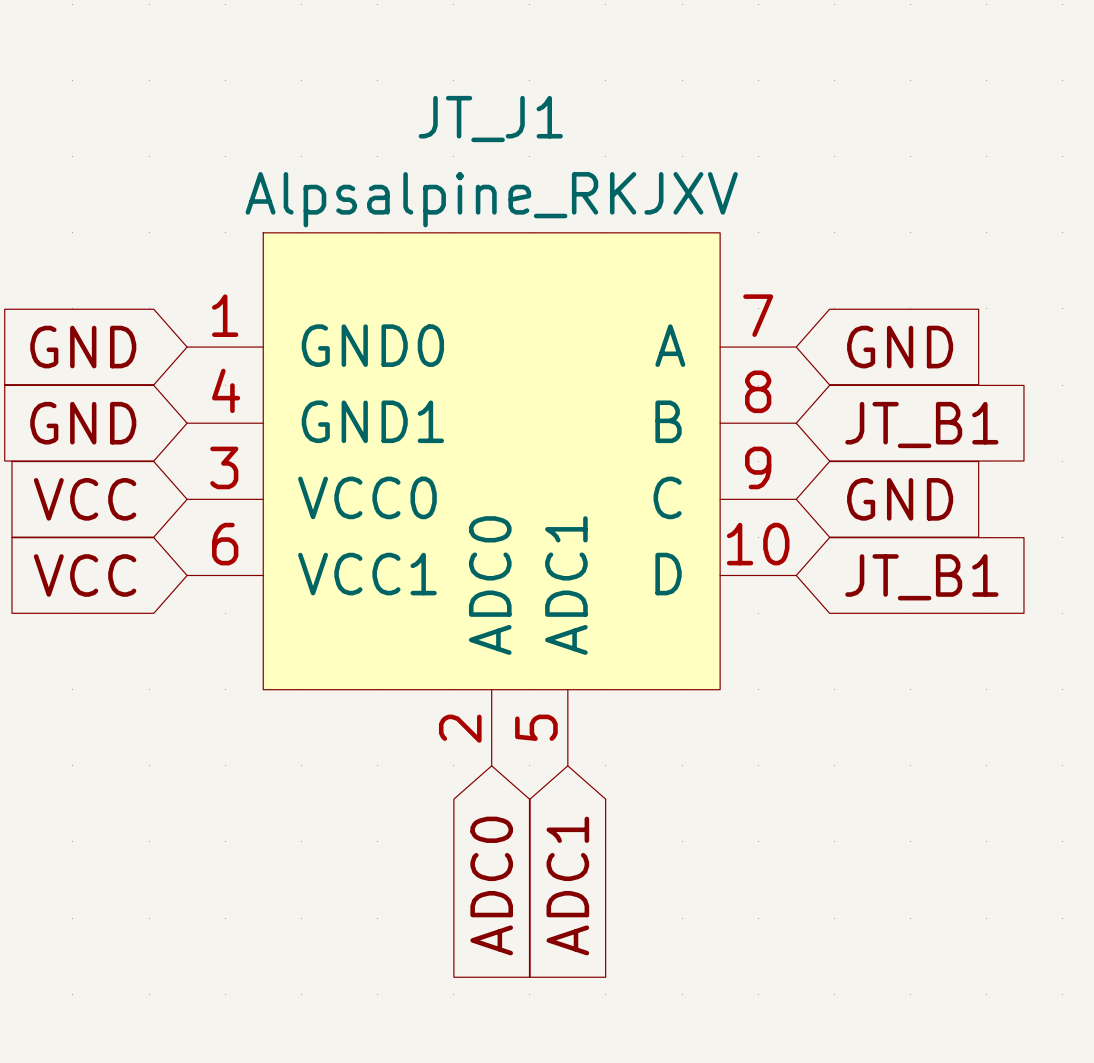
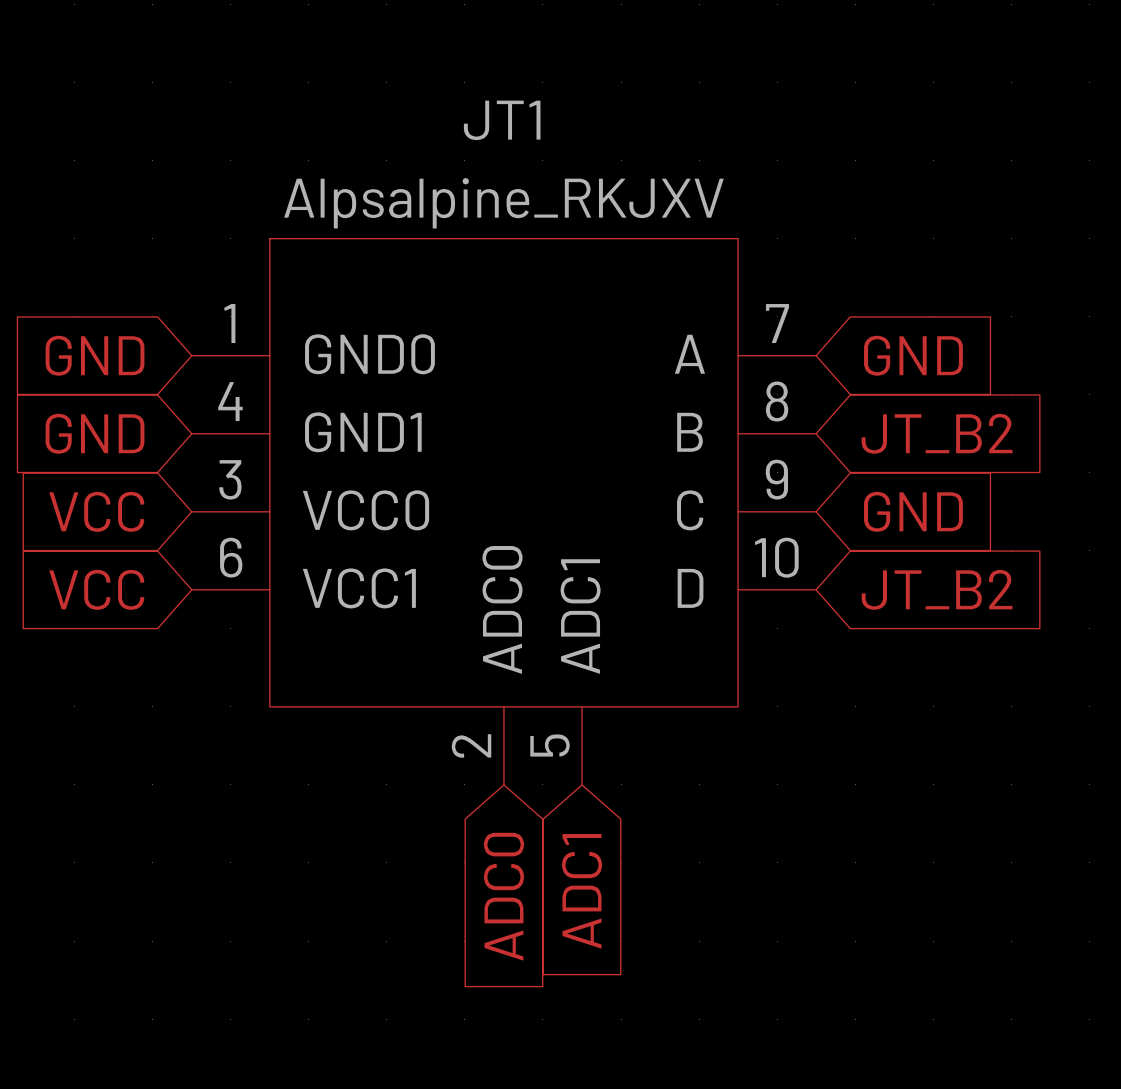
JT_J1 name: JT_J1 (490, 119) -> JT1 (502, 120)
global label: JT_B1 (921, 425) -> JT_B2 (937, 433)
global label: JT_B1 (921, 577) -> JT_B2 (937, 589)

